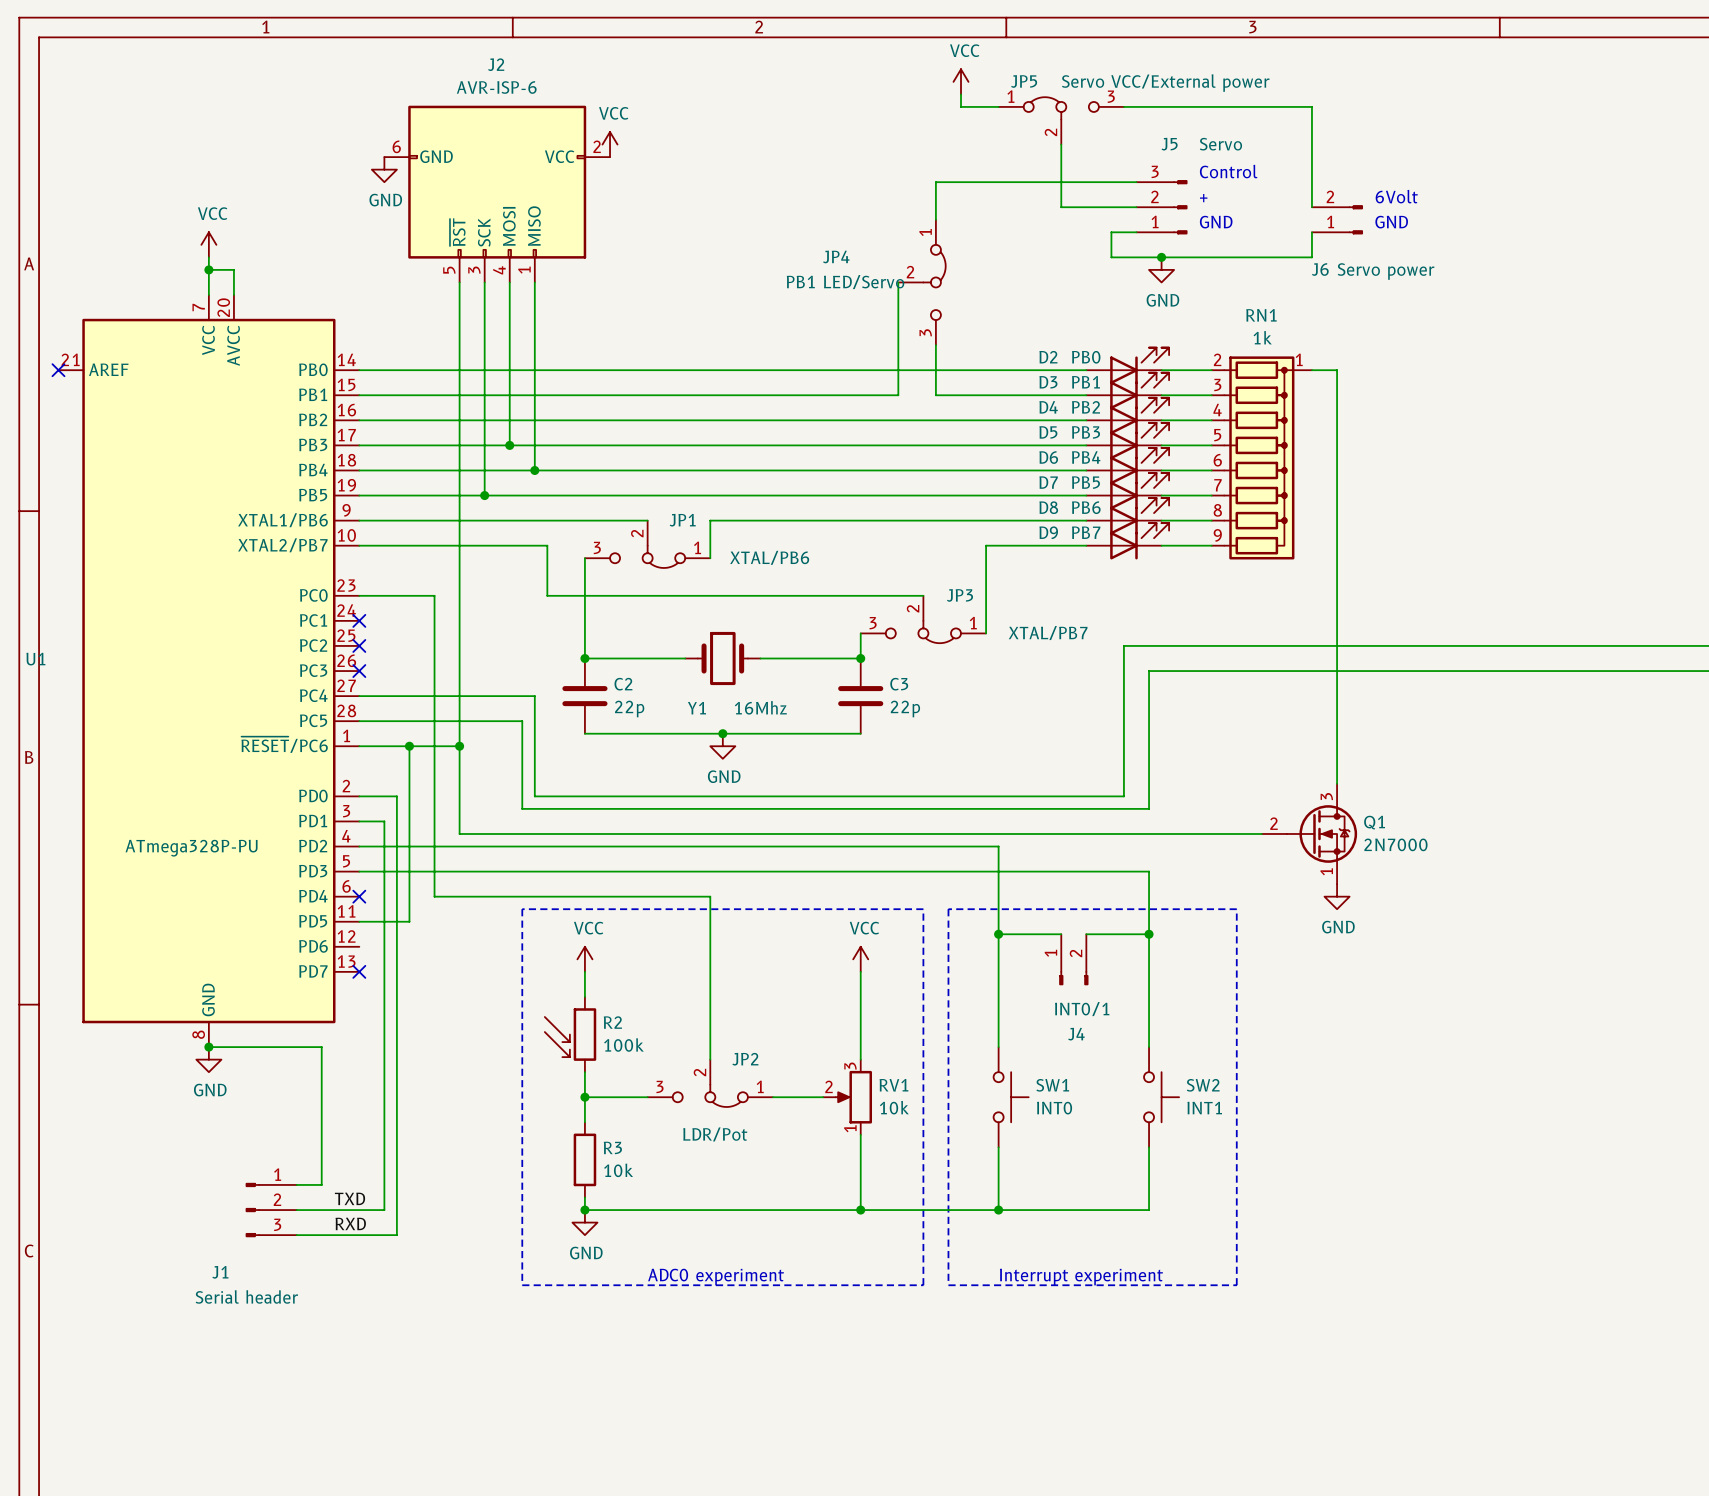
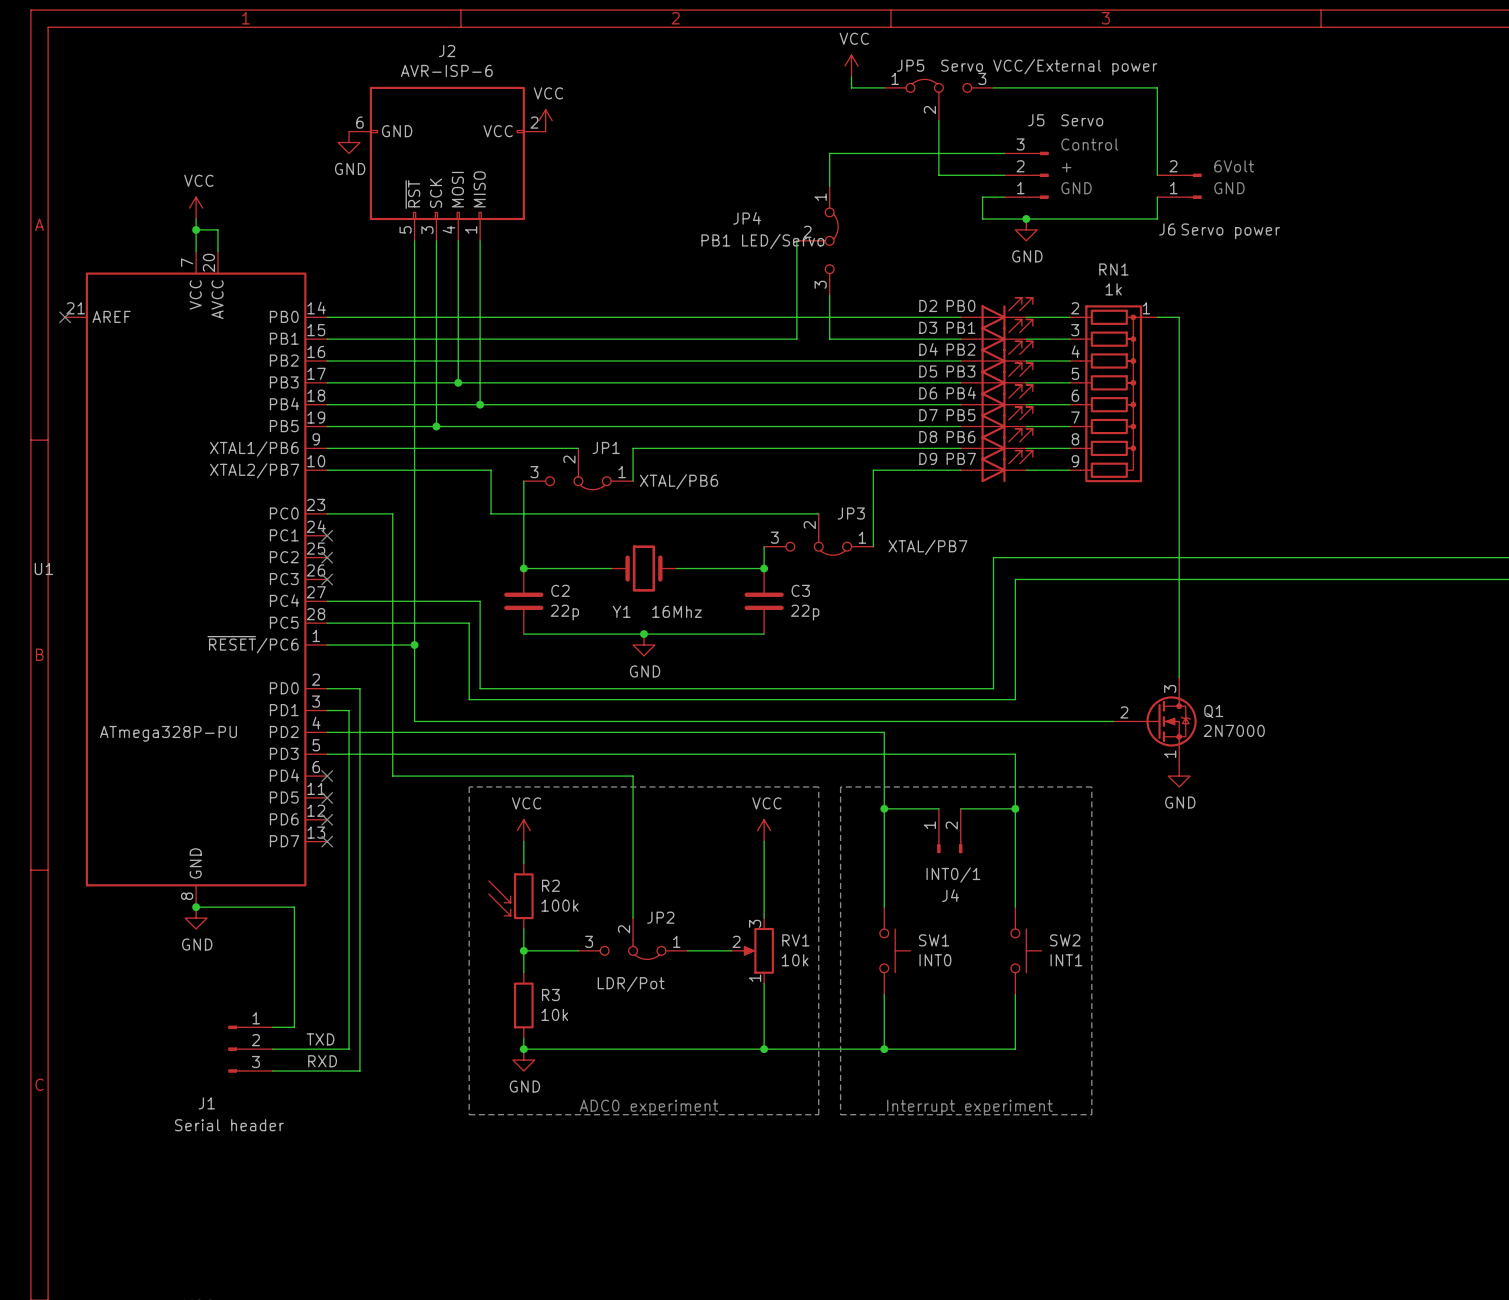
wire: (409, 746) (409, 921) (359, 921) -> none
junction: (409, 746) -> none
no-connect mark: none -> (327, 797)
no-connect mark: none -> (327, 819)

